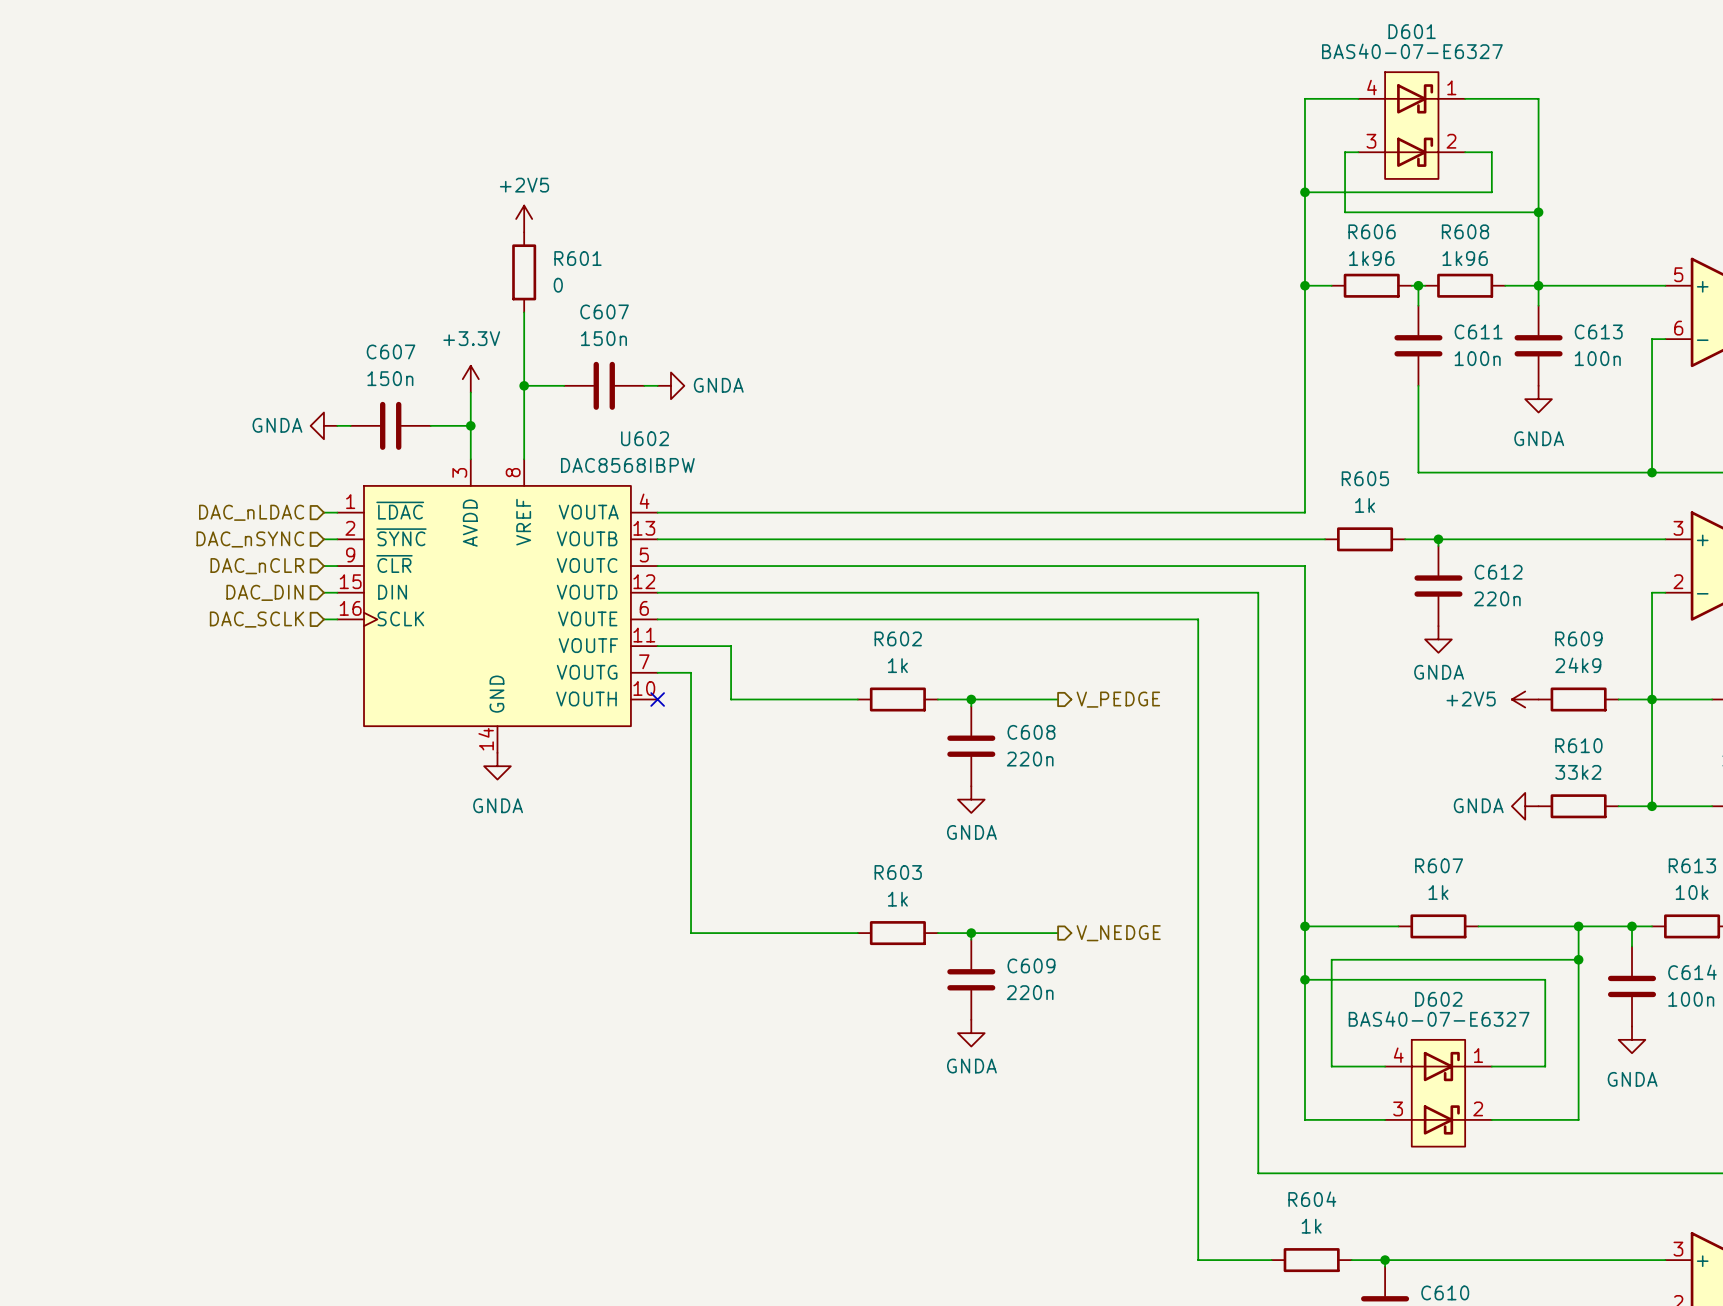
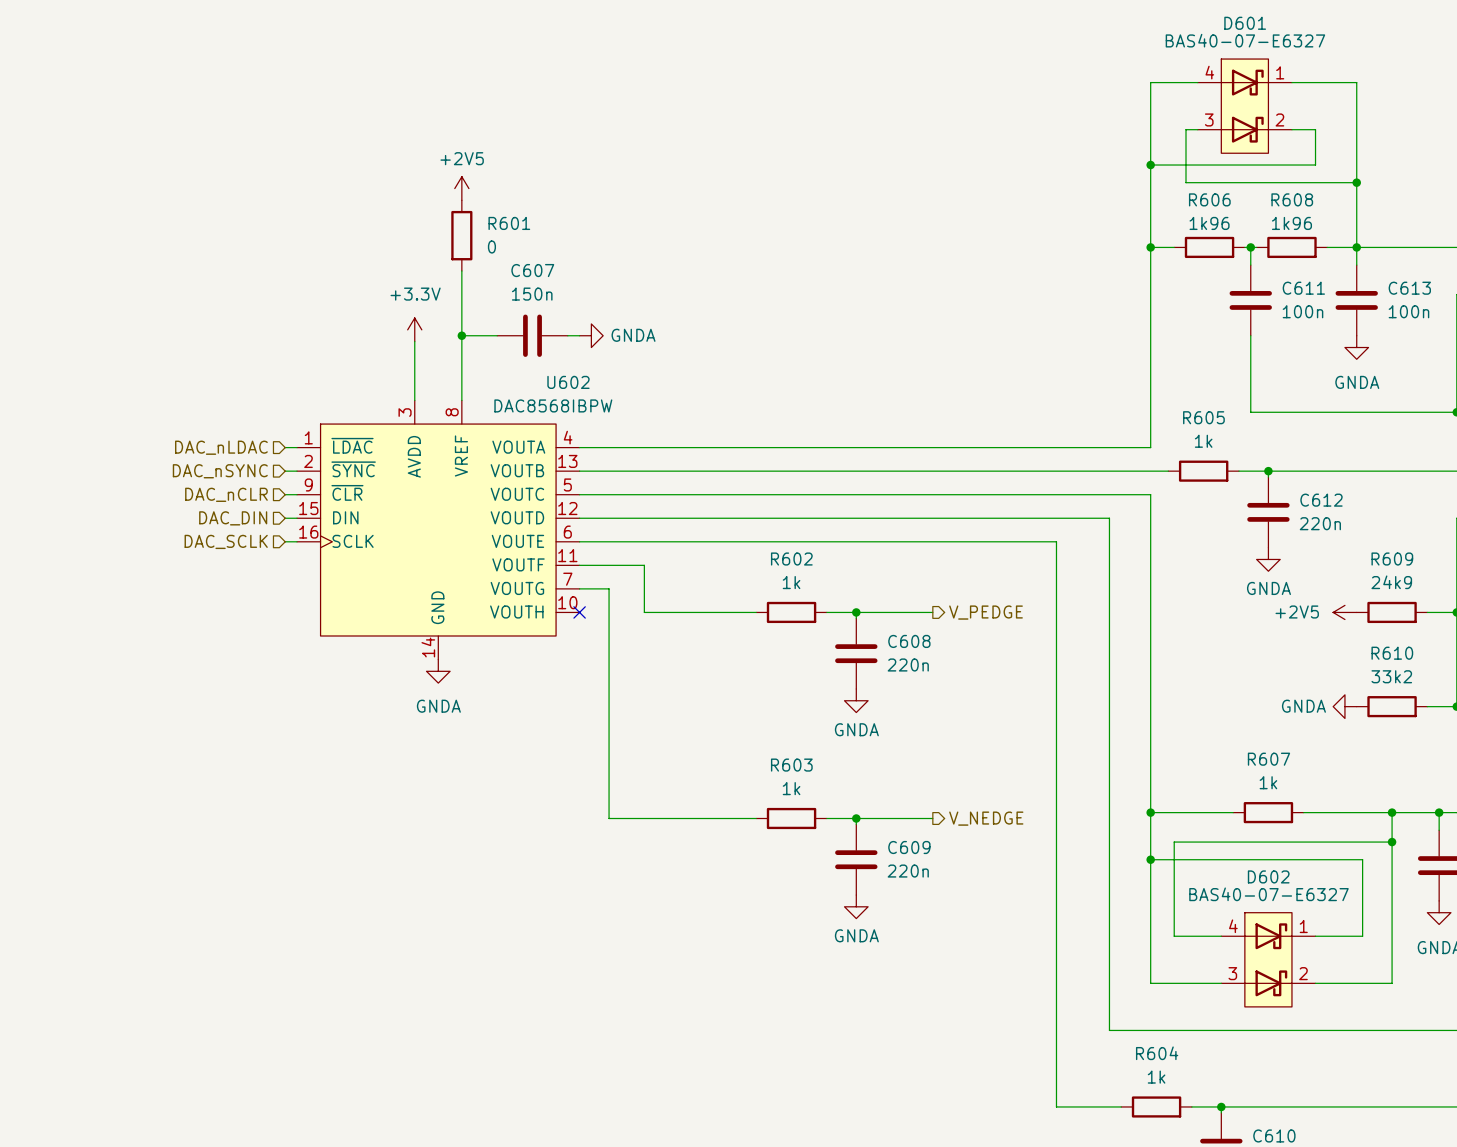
power symbol: GNDA (323, 425) -> none
wire: (337, 425) (350, 425) -> none
C607: 150n (390, 425) -> none
wire: (430, 425) (470, 425) -> none
junction: (470, 425) -> none

